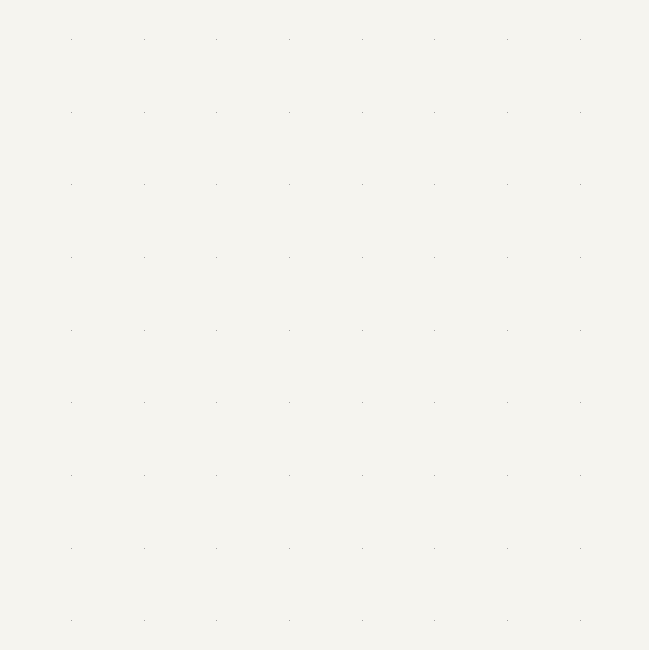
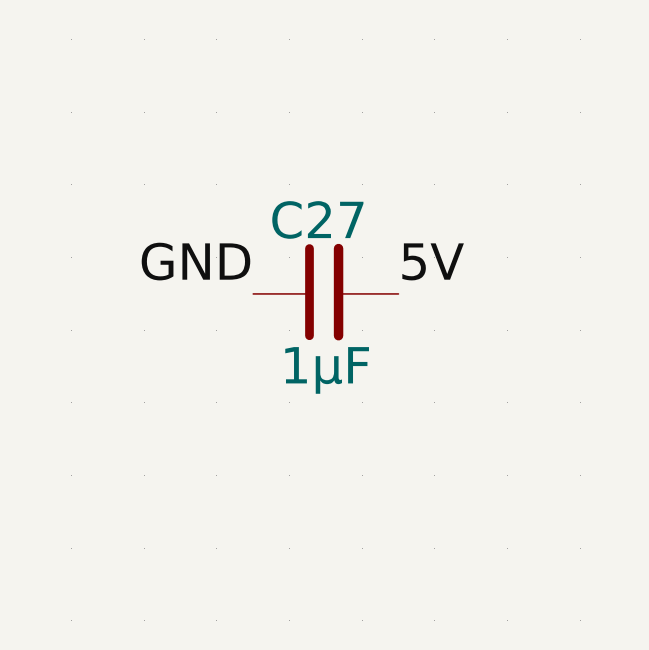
label: none -> GND (195, 261)
label: none -> 5V (433, 261)
C27: none -> 1μF (325, 292)

